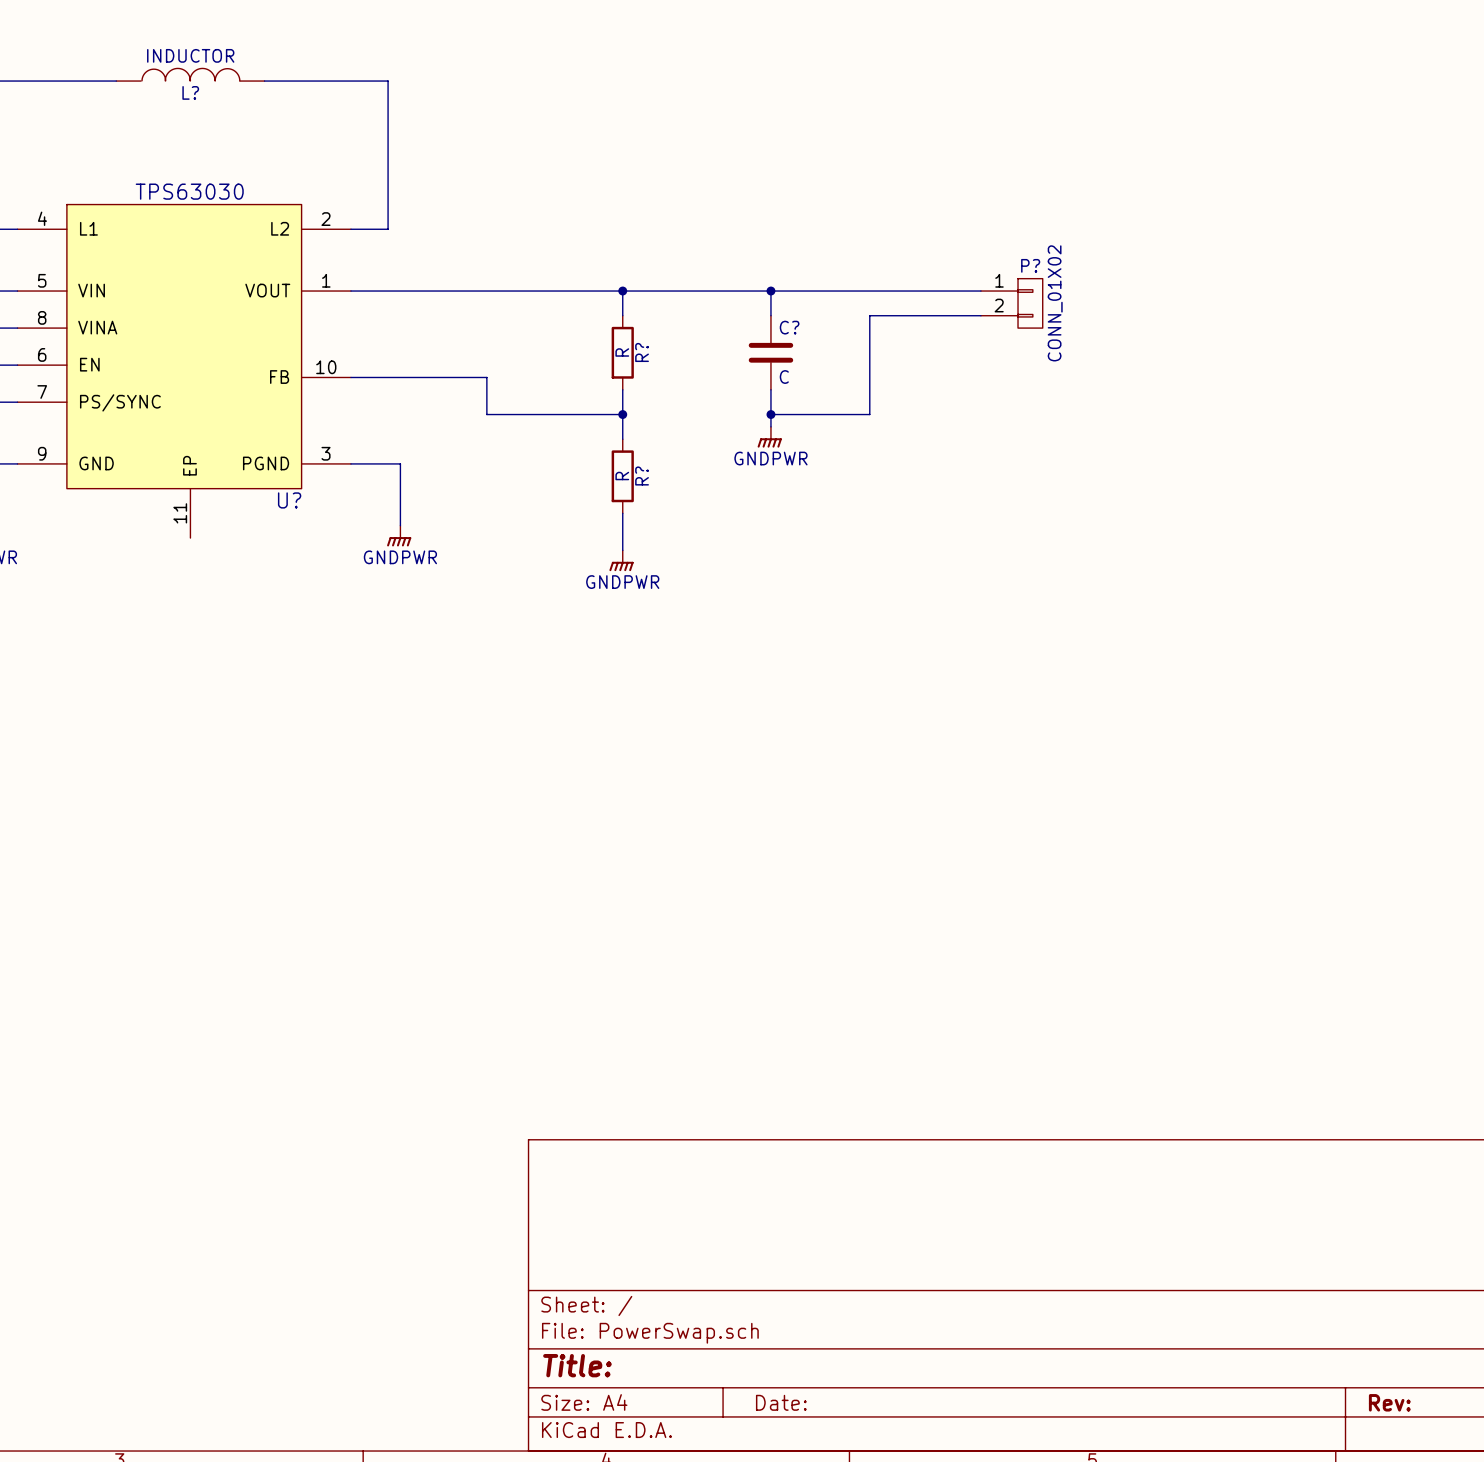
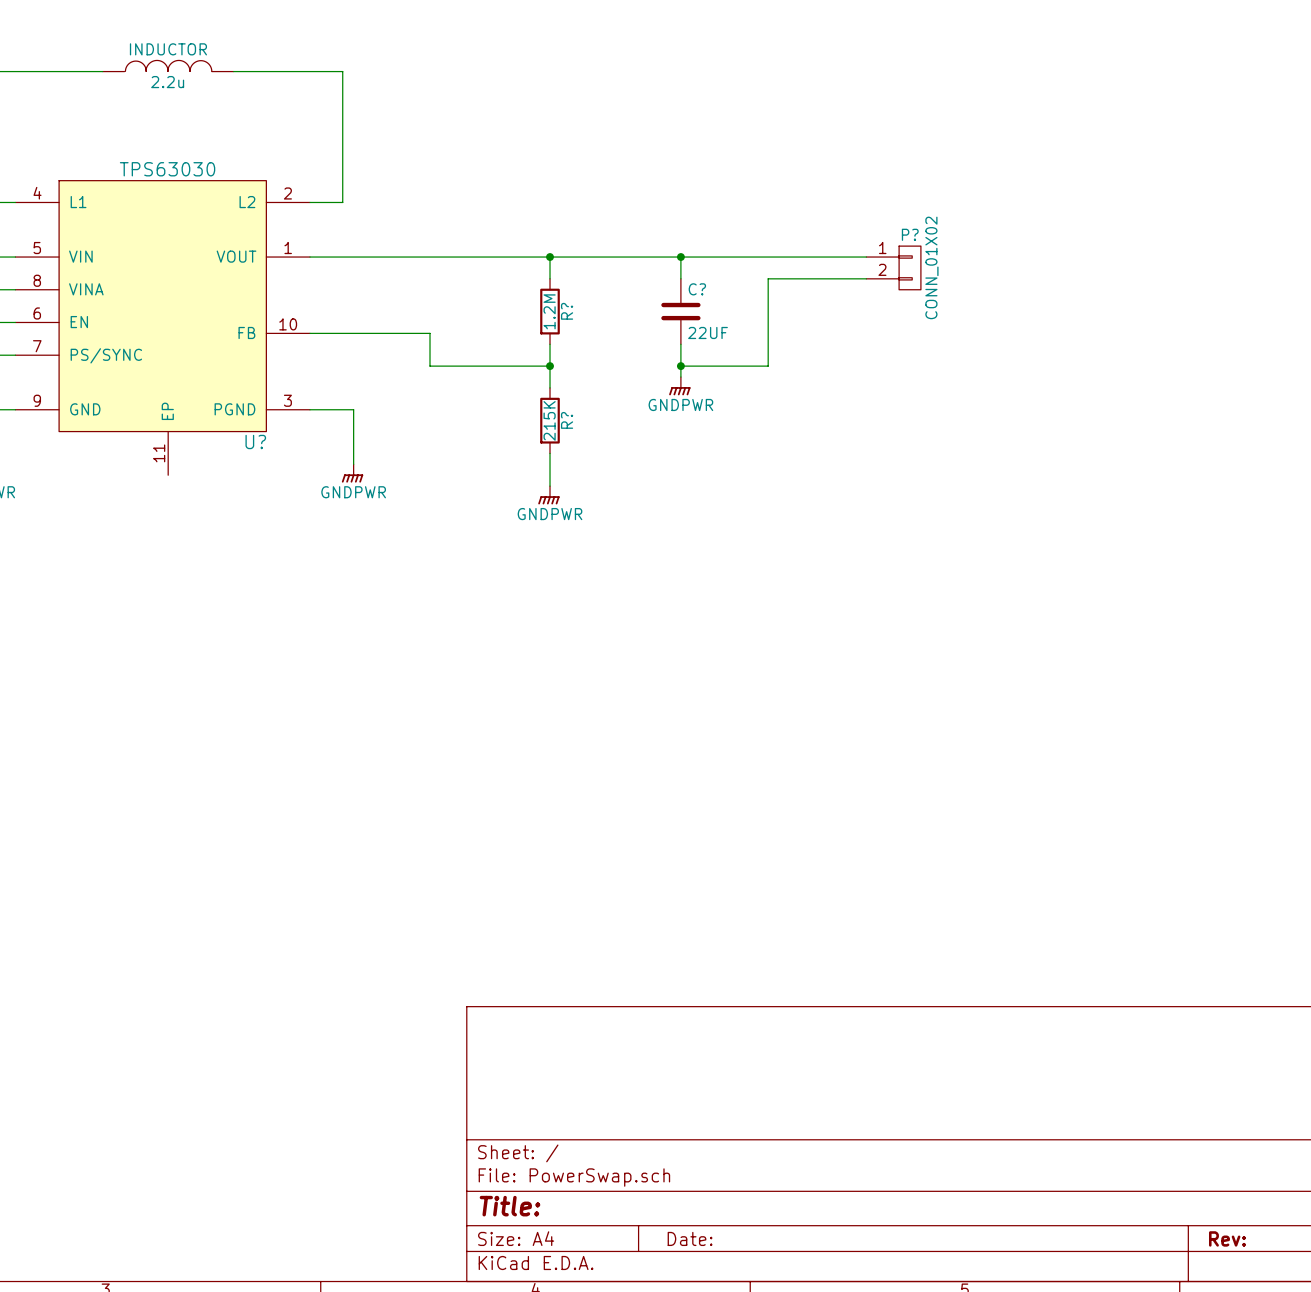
L? name: L? (190, 92) -> 2.2u (167, 82)
R? value: R (622, 352) -> 1.2M (549, 311)
C? value: C (784, 377) -> 22UF (708, 332)
R? value: R (622, 476) -> 215K (549, 420)

